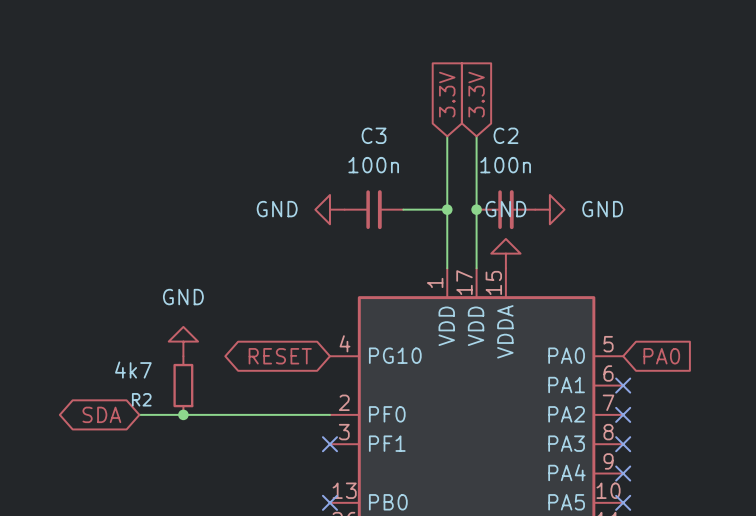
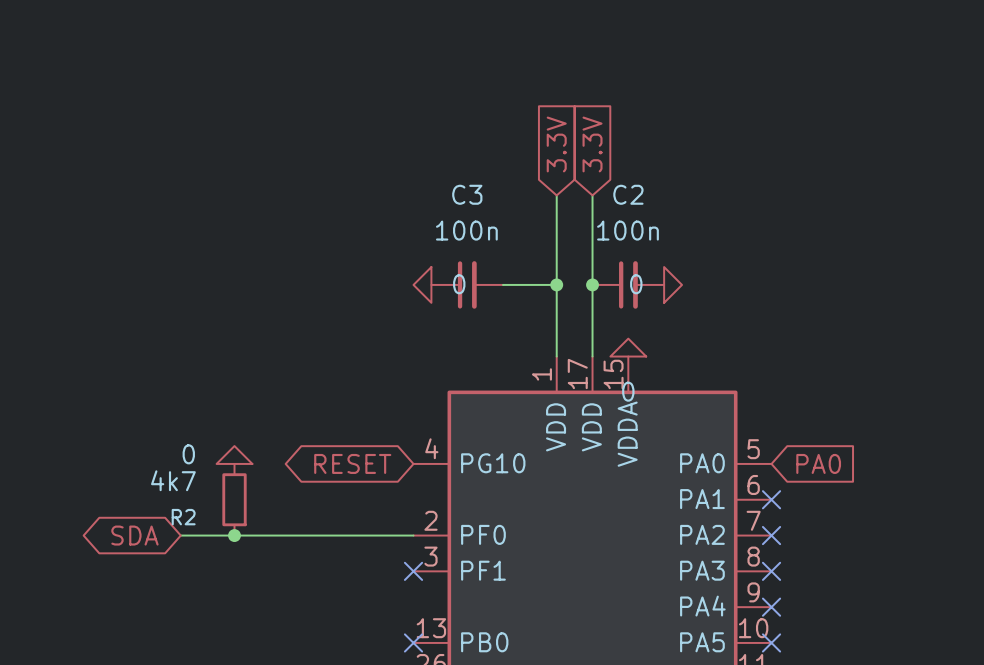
power symbol: GND (329, 209) -> 0 (422, 284)
power symbol: GND (549, 209) -> 0 (673, 284)
power symbol: GND (505, 253) -> 0 (628, 347)
power symbol: GND (183, 341) -> 0 (234, 455)

